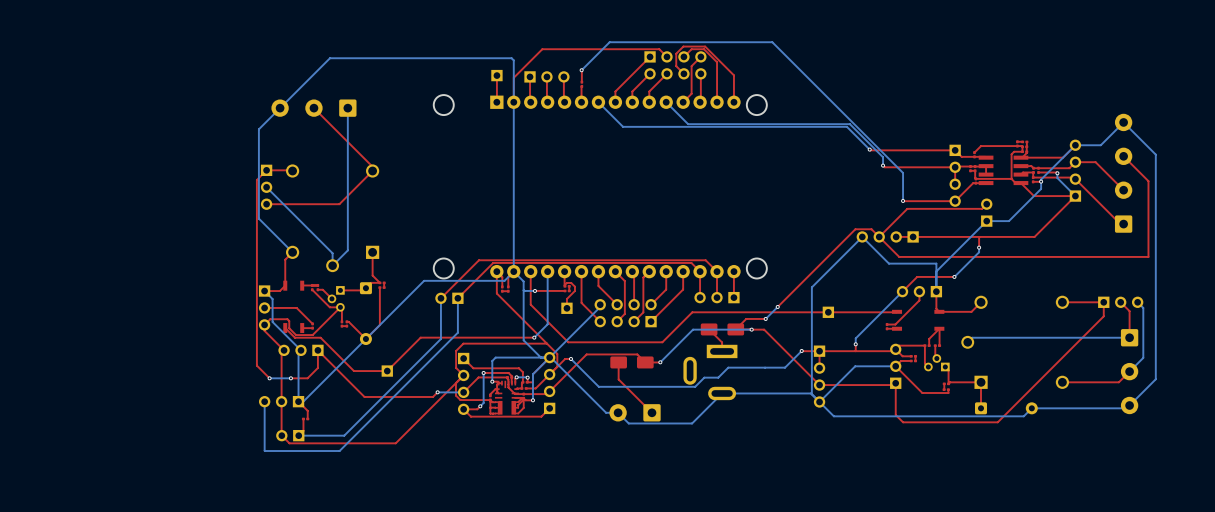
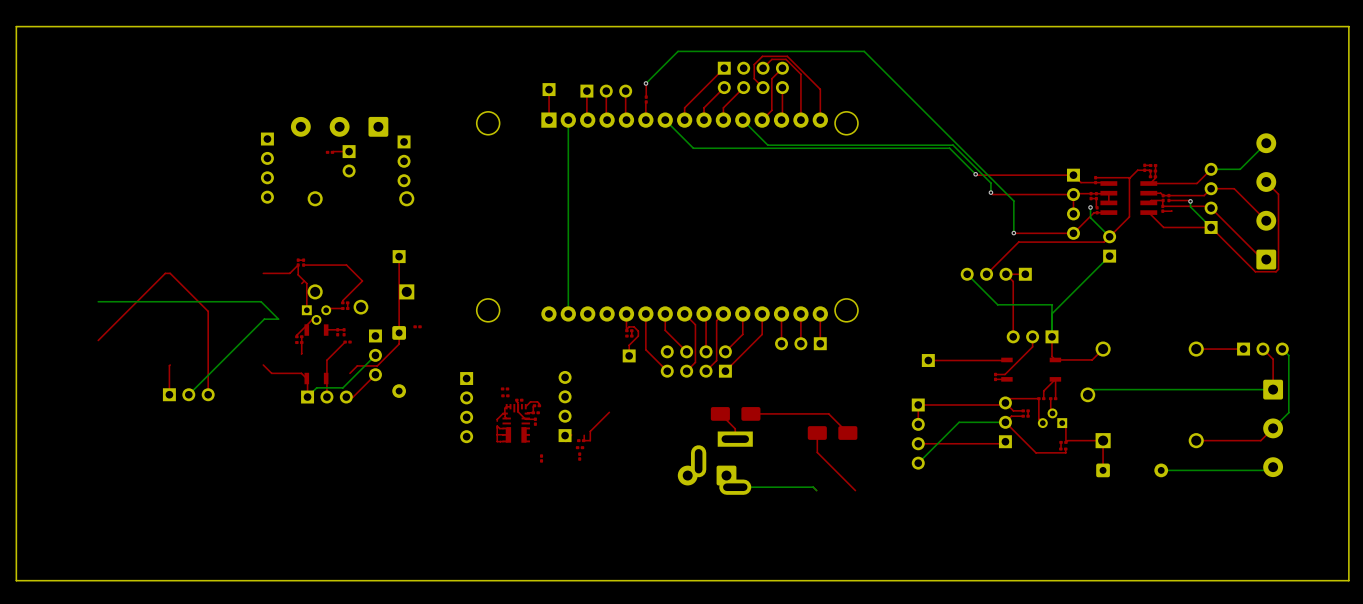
board edge: none -> (1348, 26) (16, 26) (16, 580) (1348, 580) (1348, 26)
top track: (666, 56) (659, 49) (542, 49) (513, 77) (513, 102) -> none
bottom track: (513, 102) (513, 60) (511, 58) (329, 58) (258, 129) (258, 218) (292, 252) -> none
top track: (313, 108) (372, 166) (372, 171) (339, 204) (266, 204) -> none
bottom track: (347, 108) (347, 250) (332, 265) (332, 253) (265, 188) -> none
bottom track: (1123, 122) (1155, 154) (1155, 379) (1129, 405) -> none
top track: none -> (349, 151) (332, 152)
part: none -> (330, 152)
part: none -> (349, 161)
part: none -> (404, 161)
part: none -> (267, 168)
bottom track: (1075, 145) (1041, 179) (1041, 188) (1008, 221) (986, 221) -> none
top track: (1011, 146) (981, 146) (974, 152) -> (1137, 170) (1129, 178)
top track: (1022, 151) (1014, 151) (1011, 154) (1011, 179) -> none
top track: none -> (1095, 177) (1129, 177) (1129, 216) (1109, 236)
top track: (1134, 167) (1148, 181) (1148, 256) (899, 256) (871, 229) (855, 229) (777, 306) -> none
top track: (292, 171) (266, 170) (256, 180) (256, 365) (269, 378) -> none
bottom track: none -> (1090, 207) (1090, 217) (1109, 236)
via: none -> (1090, 207)
top track: (975, 178) (1011, 178) (1015, 183) (1020, 183) -> none
via: (1041, 181) -> none
part: (266, 187) -> none
top track: (1075, 196) (1034, 236) (913, 236) -> (1211, 227) (1255, 271) (1276, 271) (1278, 269) (1278, 194)
top track: none -> (399, 256) (399, 344) (377, 365) (357, 365) (349, 373)
top track: none -> (303, 260) (298, 260)
part: none -> (298, 262)
part: none -> (303, 262)
top track: none -> (303, 265) (346, 265) (362, 281) (342, 302)
top track: none -> (263, 273) (289, 273) (298, 265) (298, 274) (306, 283) (306, 310)
bottom track: (862, 236) (811, 287) (811, 394) -> none
top track: (979, 236) (979, 247) -> none
top track: none -> (304, 281) (301, 283)
bottom track: (979, 247) (979, 252) (954, 276) -> none
via: (979, 247) -> none
top track: (292, 252) (285, 259) (285, 285) (279, 291) (264, 291) -> none
top track: (372, 252) (372, 275) (379, 282) (371, 282) (363, 290) (340, 290) -> none
bottom track: none -> (98, 301) (261, 301) (278, 319) (264, 319) (188, 394)
part: none -> (345, 302)
top track: none -> (347, 302) (347, 308)
top track: none -> (342, 308) (327, 308) (326, 310)
part: none -> (345, 308)
top track: (513, 271) (508, 277) (508, 286) -> none
top track: (530, 271) (530, 304) (568, 342) (662, 342) (692, 312) (828, 312) -> none
bottom track: (547, 271) (547, 324) (534, 337) -> none
top track: (700, 271) (691, 262) (493, 262) (457, 298) -> none
top track: (717, 271) (705, 260) (478, 260) (440, 298) -> none
top track: none -> (316, 319) (312, 319) (296, 336)
top track: (954, 276) (917, 276) (902, 291) -> (1005, 274) (1013, 281) (1013, 336)
via: (954, 276) -> none
top track: (384, 282) (384, 287) -> none
top track: (502, 286) (502, 277) (496, 271) (496, 293) (557, 353) (557, 366) -> none
top track: (379, 287) (379, 325) (365, 339) (346, 321) -> none
part: (382, 287) -> none
top track: (312, 289) (329, 307) (340, 307) -> none
top track: (317, 289) (322, 289) (331, 298) -> none
part: (502, 289) -> none
part: (508, 289) -> none
bottom track: (523, 290) (534, 290) -> none
via: (534, 290) -> none
top track: (564, 290) (534, 290) -> none
bottom track: (264, 291) (272, 299) (272, 321) (300, 350) (298, 352) (298, 401) (303, 401) (424, 280) (504, 280) (513, 271) (523, 281) (523, 340) (540, 357) -> none
part: none -> (299, 336)
top track: none -> (301, 336) (301, 353)
top track: (508, 291) (502, 291) -> none
bottom track: (902, 291) (855, 338) (855, 344) -> none
top track: none -> (98, 340) (165, 273) (170, 273) (208, 311) (208, 394)
part: none -> (299, 342)
top track: none -> (345, 342) (326, 360) (326, 397)
part: none -> (347, 342)
part rotation: 0° (336, 298) -> 90° counterclockwise (316, 315)
part position: (336, 298) -> (316, 315)
bottom track: (440, 298) (440, 338) (344, 435) (298, 435) -> none
part: (449, 298) -> none
bottom track: (457, 298) (457, 332) (339, 451) (264, 451) (264, 401) -> none
top track: (1103, 302) (1103, 316) (997, 422) (903, 422) (895, 414) (895, 383) -> none
bottom track: (600, 304) (600, 307) (532, 374) (532, 400) -> none
bottom track: (777, 306) (765, 318) -> none
via: (777, 306) -> none
top track: (264, 307) (296, 307) (312, 323) -> none
part: (264, 307) -> none
top track: (340, 307) (341, 321) -> none
top track: (340, 307) (312, 335) (296, 335) (289, 328) (287, 319) (270, 319) (264, 324) (264, 330) (284, 350) (281, 352) (281, 435) (289, 443) (395, 443) (463, 375) (456, 367) (456, 350) (463, 343) (546, 343) -> none
bottom track: none -> (375, 355) (342, 387) (316, 387) (307, 397)
part: none -> (375, 355)
top track: none -> (170, 364) (169, 394)
top track: none -> (263, 364) (271, 373) (301, 373) (307, 379) (307, 397)
top track: (765, 318) (746, 318) (735, 329) (764, 329) (819, 385) -> none
via: (765, 318) -> none
top track: none -> (375, 374) (353, 397) (346, 397)
part: (312, 326) -> none
top track: (285, 328) (294, 337) (320, 337) (353, 371) (387, 371) (420, 337) (534, 337) -> none
top track: (312, 328) (302, 328) -> none
top track: (709, 329) (722, 342) (722, 351) -> (720, 413) (735, 428) (735, 439)
part: (722, 329) -> none
bottom track: (751, 329) (693, 329) (660, 362) -> none
via: (751, 329) -> none
part: none -> (505, 388)
via: (534, 337) -> none
part: none -> (188, 394)
part: none -> (505, 395)
top track: (855, 344) (855, 351) -> none
via: (855, 344) -> none
top track: none -> (516, 400) (517, 411) (526, 419) (535, 419)
part: none -> (519, 400)
part rotation: 0° (300, 350) -> 180° (326, 397)
top track: (801, 350) (819, 351) -> none
bottom track: (801, 350) (785, 367) (728, 367) (718, 377) (704, 377) (695, 386) (598, 386) (570, 358) -> none
via: (801, 350) -> none
top track: none -> (534, 405) (533, 412) (526, 413)
part: none -> (536, 405)
top track: none -> (539, 405) (537, 401) (530, 401) (525, 406)
part: none -> (565, 406)
part: none -> (466, 407)
part: none -> (535, 412)
top track: (463, 358) (473, 368) (518, 368) (522, 372) (522, 382) (521, 388) (516, 389) -> none
top track: (570, 358) (565, 358) (535, 388) (526, 388) -> none
via: (570, 358) -> none
top track: none -> (750, 413) (828, 413) (847, 433)
top track: (618, 362) (618, 379) (651, 412) -> (817, 433) (817, 452) (855, 490)
part position: (631, 362) -> (735, 413)
top track: (660, 362) (645, 362) (637, 354) (586, 354) (546, 394) (515, 394) (508, 387) (507, 377) (478, 377) (463, 392) -> none
via: (660, 362) -> none
part: none -> (535, 421)
part position: (387, 371) -> (399, 256)
top track: none -> (503, 428) (497, 426) (497, 441) (500, 441)
top track: (483, 372) (508, 372) (511, 377) -> none
bottom track: (483, 372) (483, 402) (480, 406) -> none
via: (483, 372) -> none
part position: (710, 372) -> (721, 463)
part: none -> (832, 433)
bottom track: (516, 377) (527, 377) -> none
via: (516, 377) -> none
via: (527, 377) -> none
via: (269, 378) -> none
top track: (290, 378) (307, 378) (317, 367) (317, 350) (364, 396) (432, 396) (437, 392) -> none
bottom track: (290, 378) (269, 378) -> none
via: (290, 378) -> none
top track: (492, 381) (498, 383) -> none
bottom track: (492, 381) (492, 360) (495, 357) (550, 357) (606, 412) (618, 412) (628, 423) (692, 423) (722, 393) (811, 393) (833, 416) (1023, 416) (1031, 408) -> none
via: (492, 381) -> none
part: (549, 382) -> none
top track: (455, 383) (455, 395) (460, 400) (490, 400) -> none
part: (463, 383) -> none
top track: (501, 383) (497, 384) (497, 389) (490, 395) -> (510, 406) (504, 408) (504, 413) (497, 421)
top track: (497, 389) (498, 393) -> (505, 413) (506, 418)
via: (437, 392) -> none
bottom track: (463, 392) (437, 392) -> none
part position: (506, 397) -> (516, 423)
top track: (515, 397) (532, 400) -> none
top track: (523, 399) (518, 407) -> none
top track: (490, 400) (490, 413) (493, 413) -> none
top track: (490, 400) (495, 402) -> none
via: (532, 400) -> none
part: (281, 401) -> none
top track: (298, 401) (307, 410) (307, 418) -> none
top track: (518, 402) (523, 398) (523, 407) (518, 413) -> none
top track: (480, 406) (477, 409) (463, 409) (470, 416) (541, 416) (549, 408) -> none
via: (480, 406) -> none
top track: (490, 407) (495, 407) -> (497, 434) (503, 435)
top track: (495, 413) (493, 413) -> (503, 441) (500, 441)
top track: (303, 418) (303, 430) (298, 435) -> none
part: (305, 418) -> none
bottom track: none -> (735, 487) (813, 487) (816, 490)
part: (290, 435) -> none

